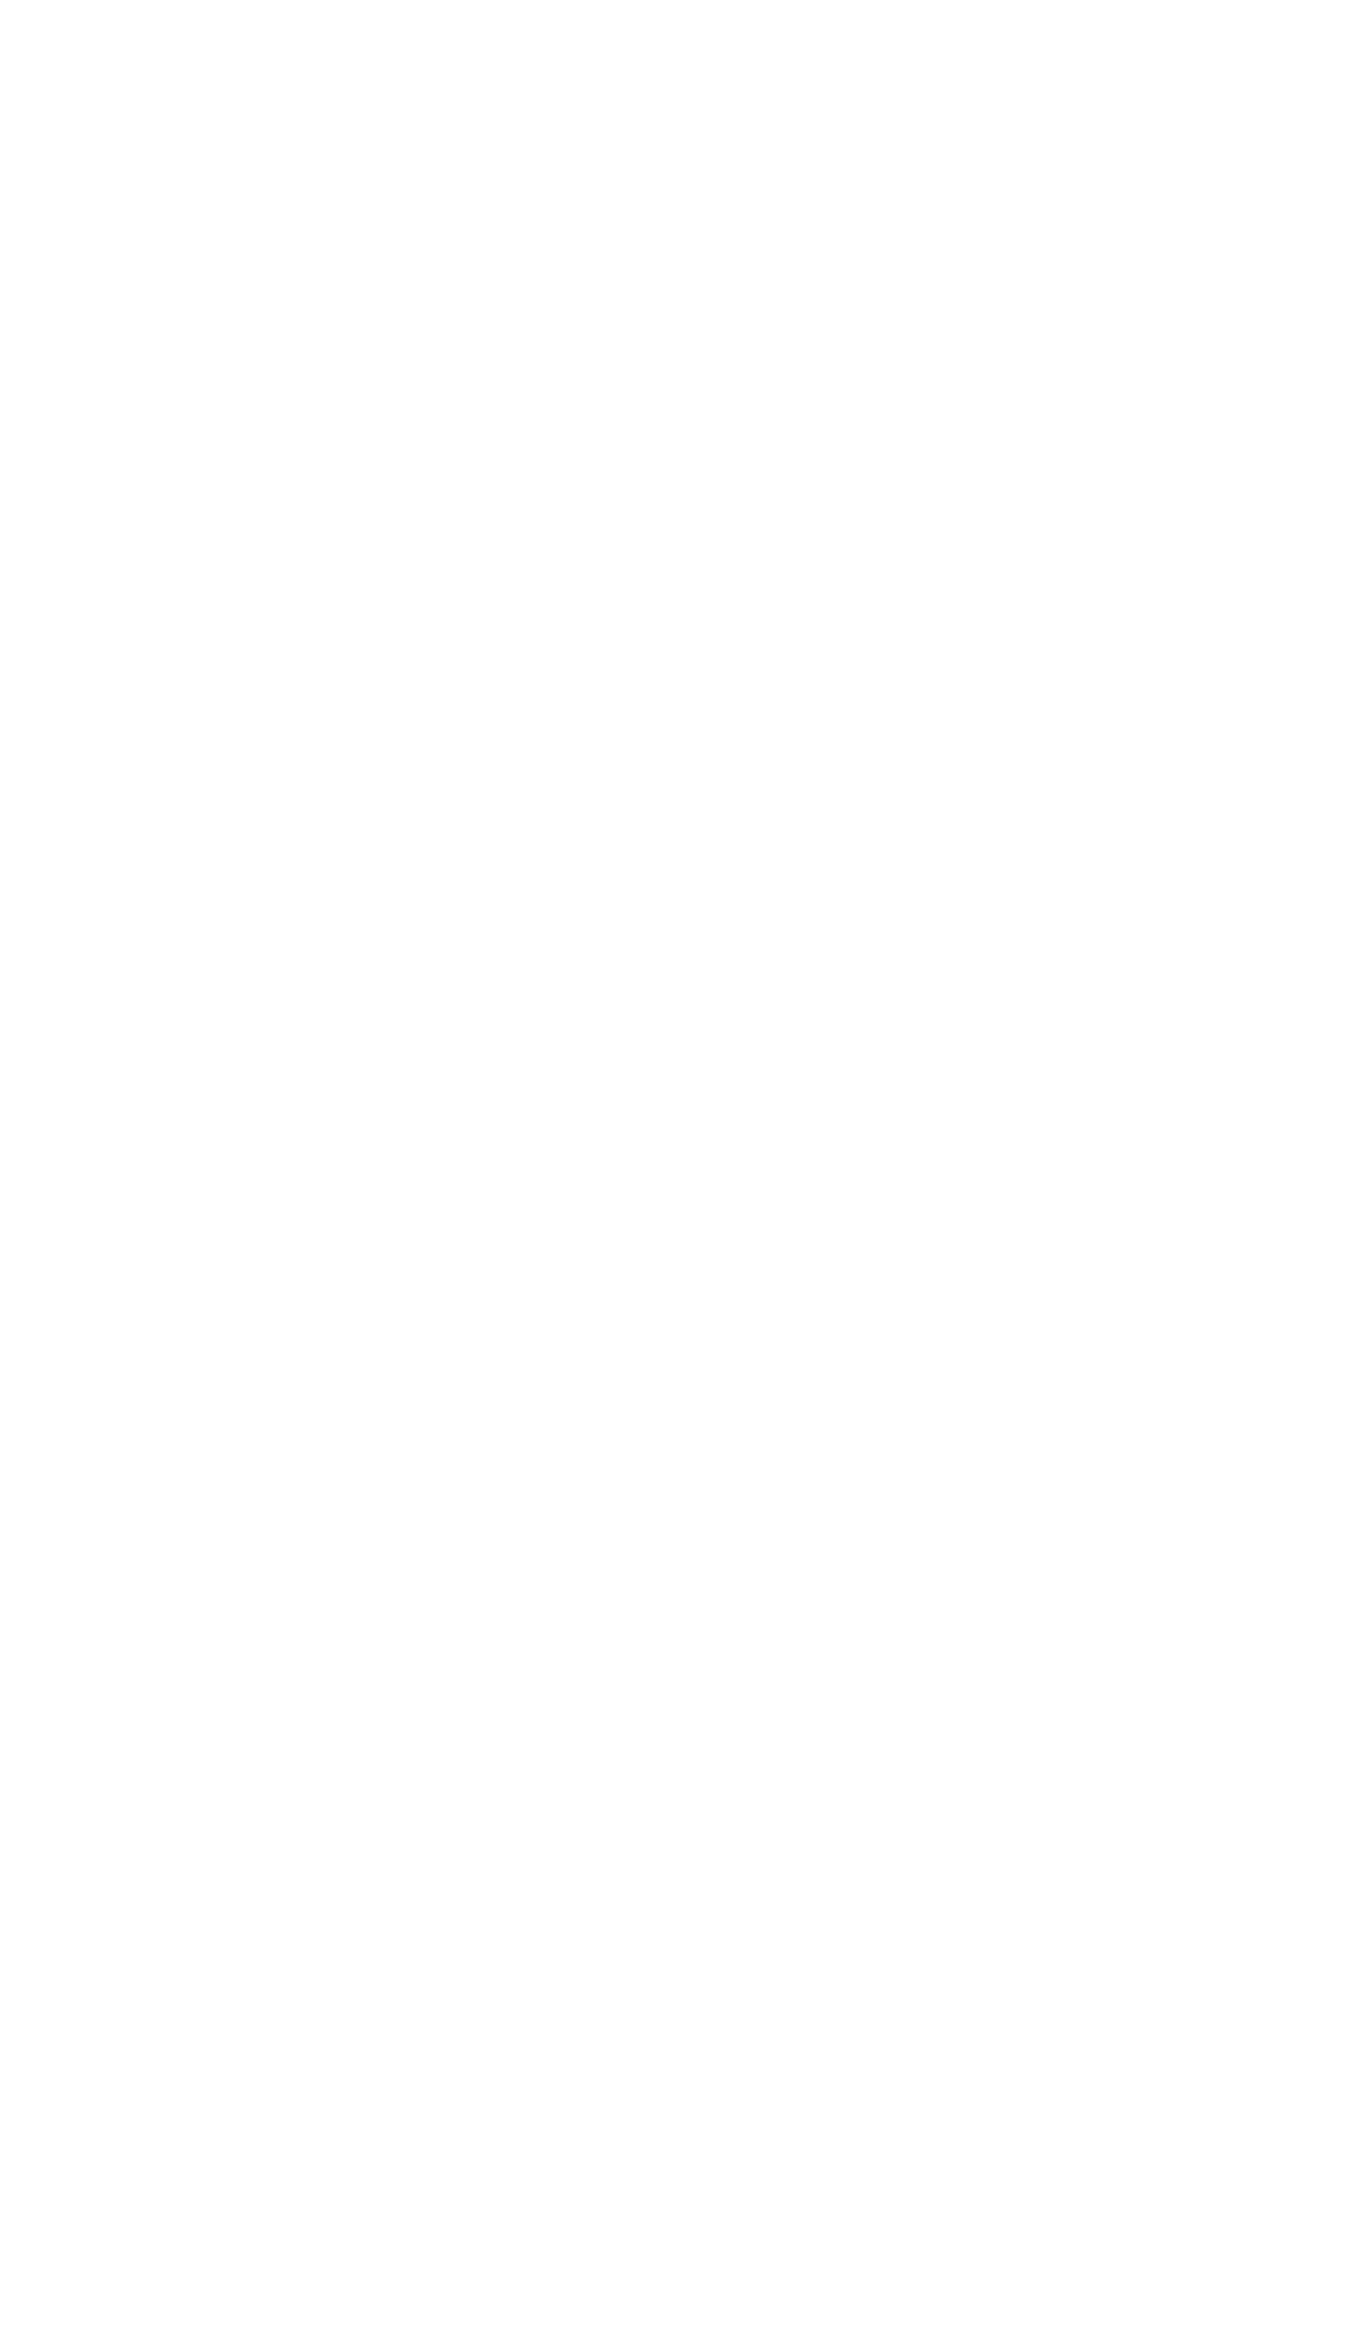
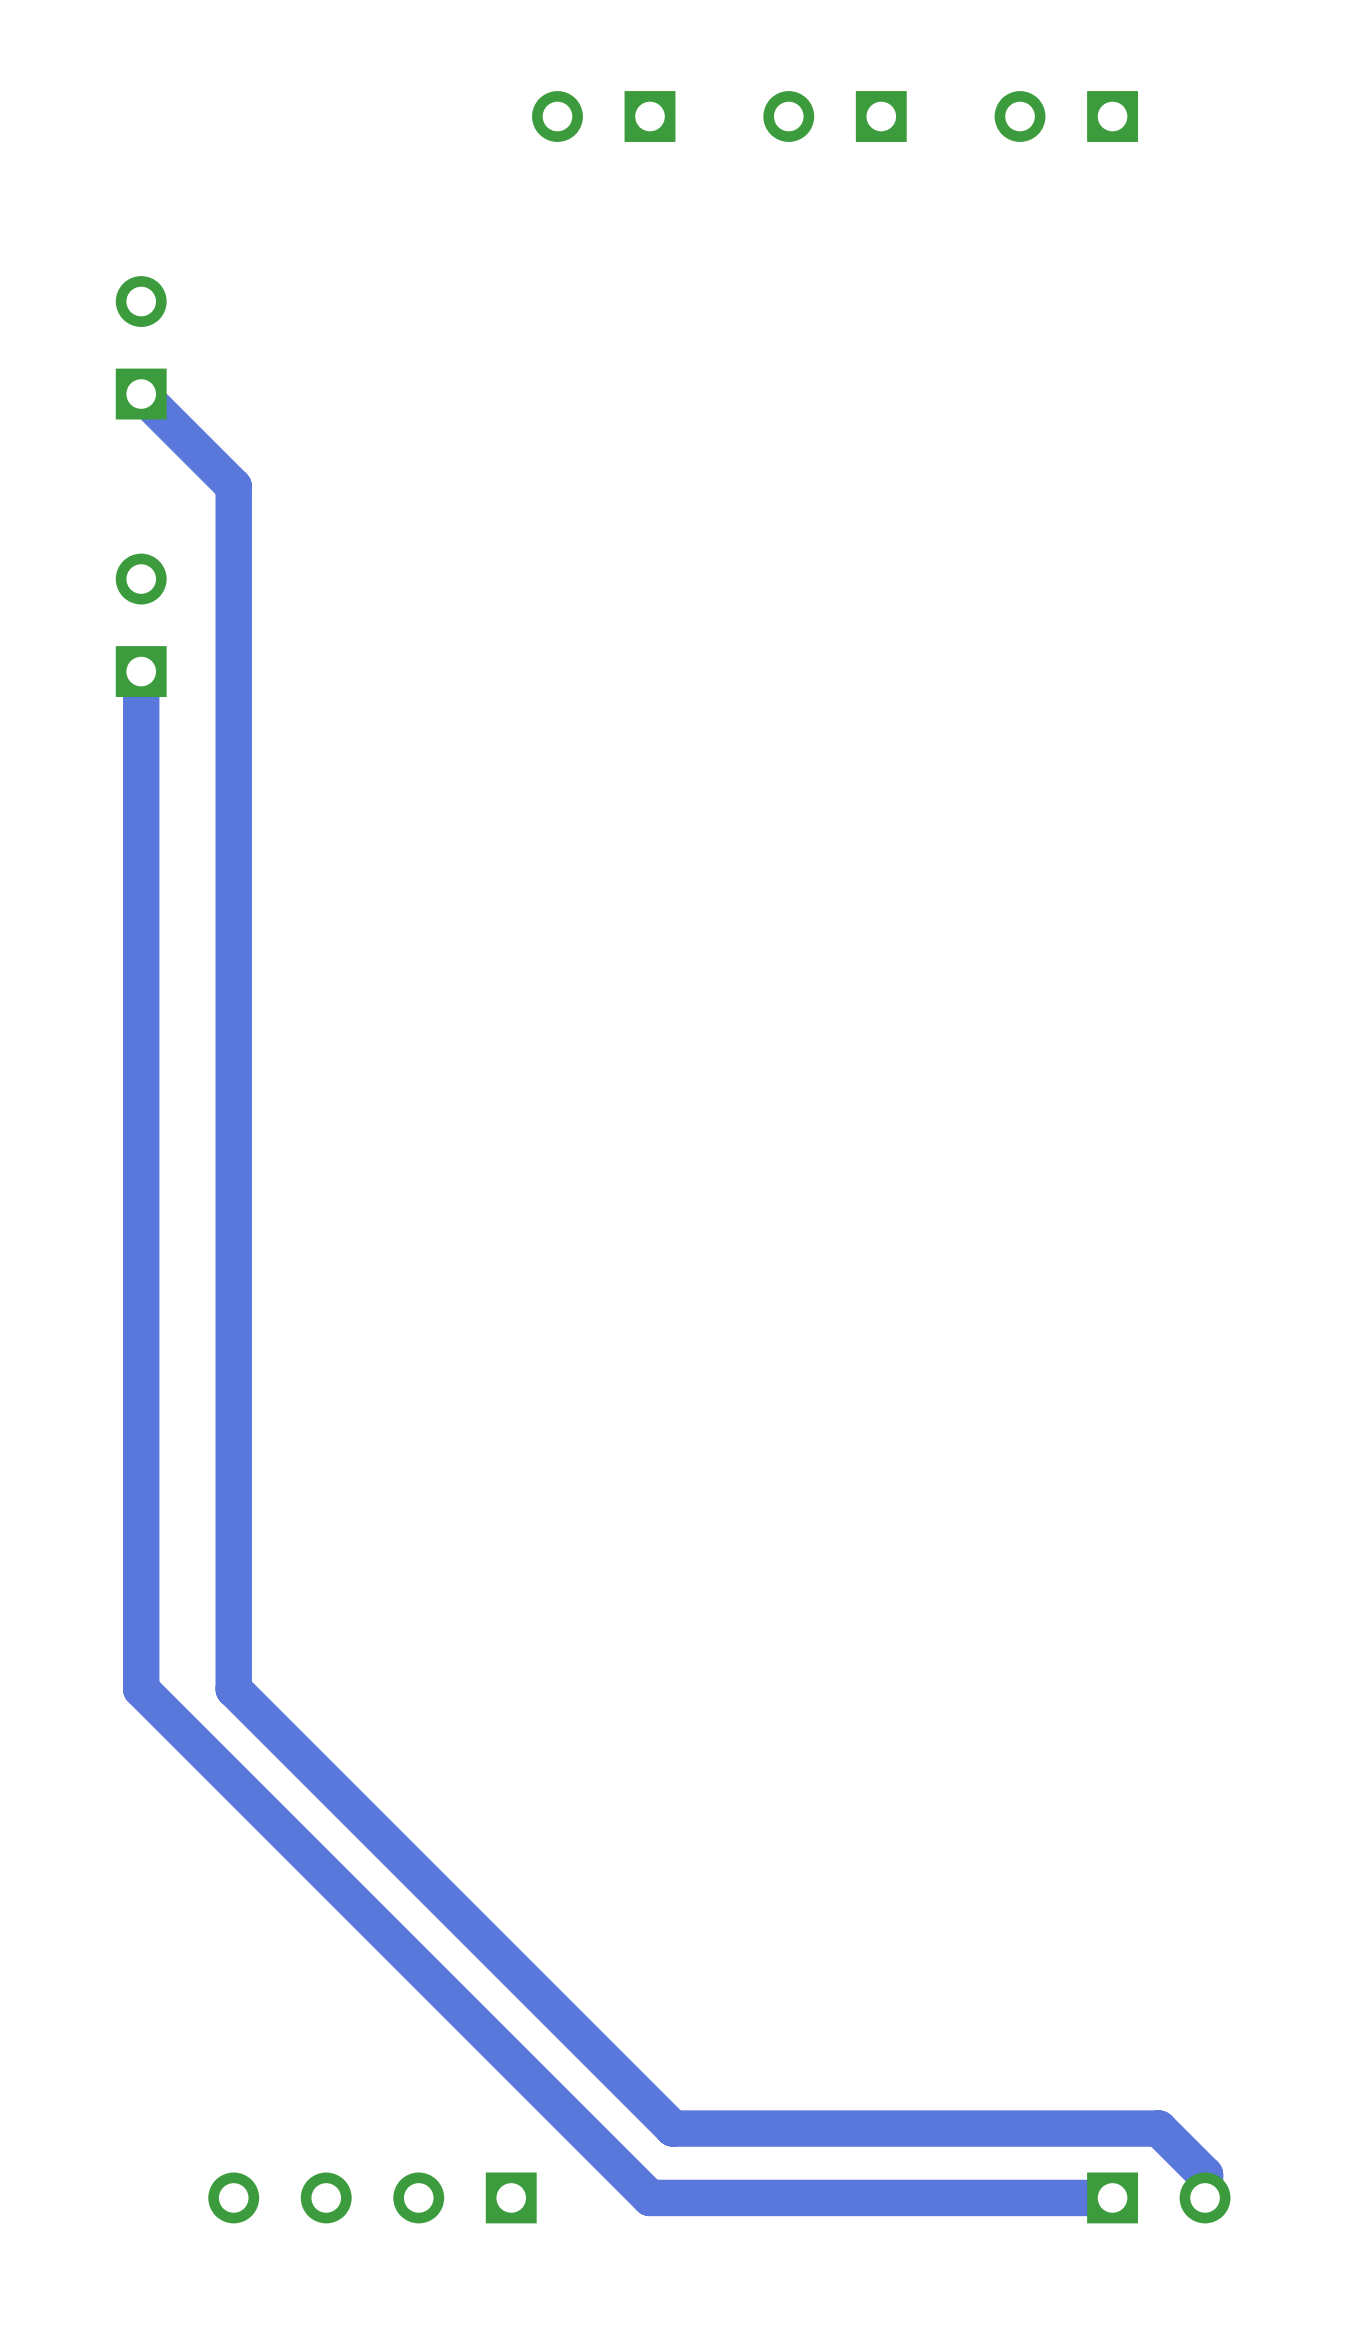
part: none -> (603, 116)
part: none -> (835, 116)
part: none -> (1066, 116)
part: none -> (141, 347)
track: none -> (141, 394) (233, 486) (233, 1689) (673, 2128) (1158, 2128) (1205, 2174) (1205, 2197)
part: none -> (141, 625)
track: none -> (141, 671) (141, 1689) (650, 2197) (1112, 2197)
part: none -> (372, 2197)
part: none -> (1158, 2197)

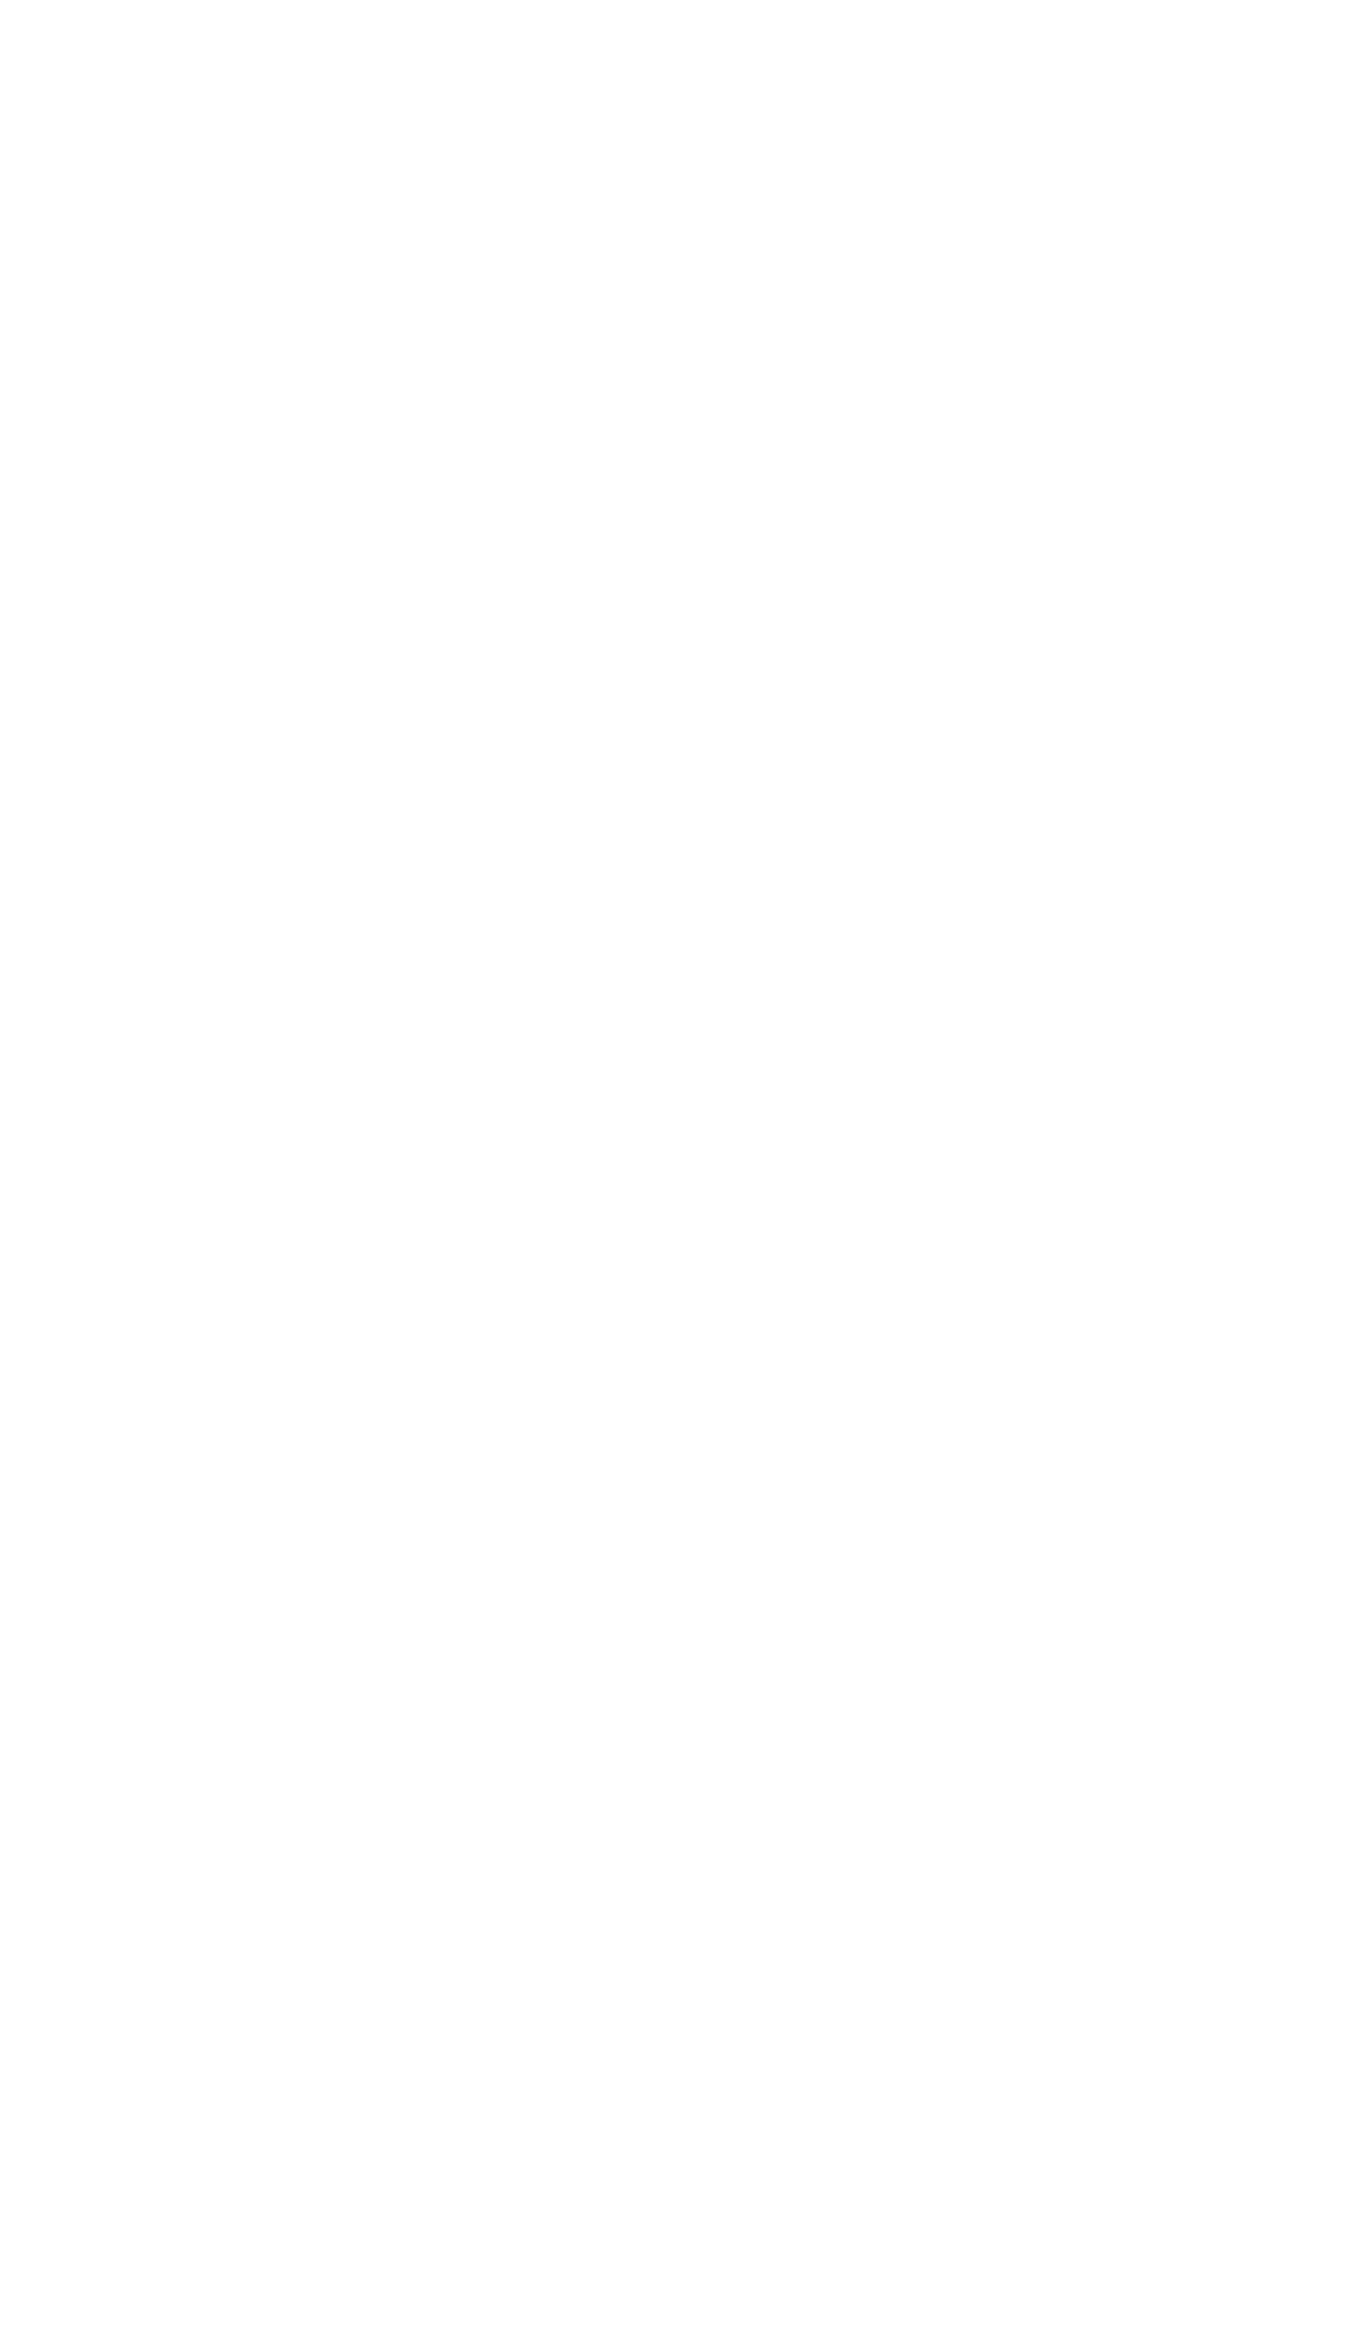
part: (603, 116) -> none
part: (835, 116) -> none
part: (1066, 116) -> none
part: (141, 347) -> none
track: (141, 394) (233, 486) (233, 1689) (673, 2128) (1158, 2128) (1205, 2174) (1205, 2197) -> none
part: (141, 625) -> none
track: (141, 671) (141, 1689) (650, 2197) (1112, 2197) -> none
part: (372, 2197) -> none
part: (1158, 2197) -> none

